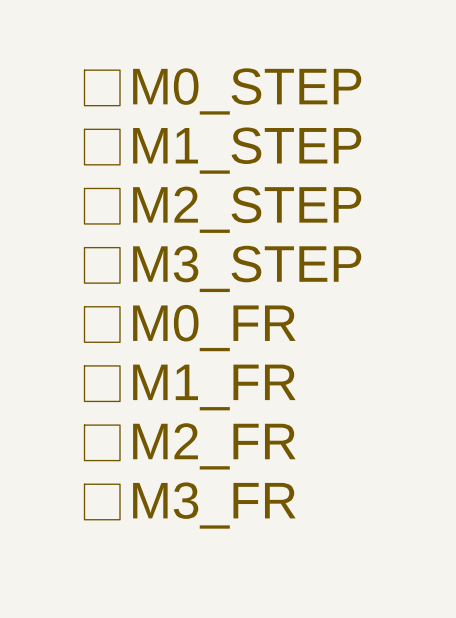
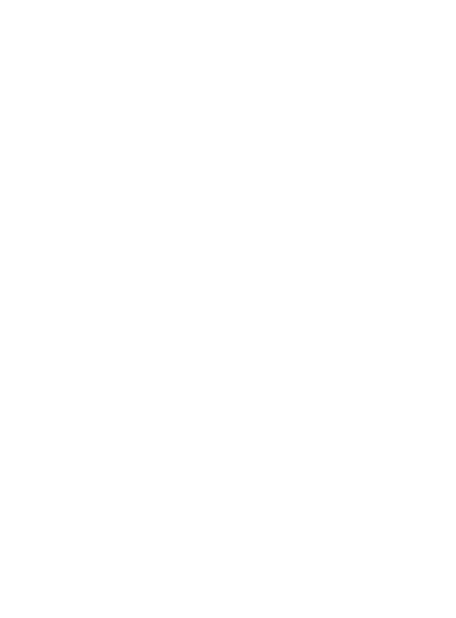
hierarchical label: M0_STEP (247, 91) -> none
hierarchical label: M1_STEP (247, 150) -> none
hierarchical label: M2_STEP (247, 209) -> none
hierarchical label: M3_STEP (247, 268) -> none
hierarchical label: M0_FR (214, 328) -> none
hierarchical label: M1_FR (214, 387) -> none
hierarchical label: M2_FR (214, 446) -> none
hierarchical label: M3_FR (214, 505) -> none

